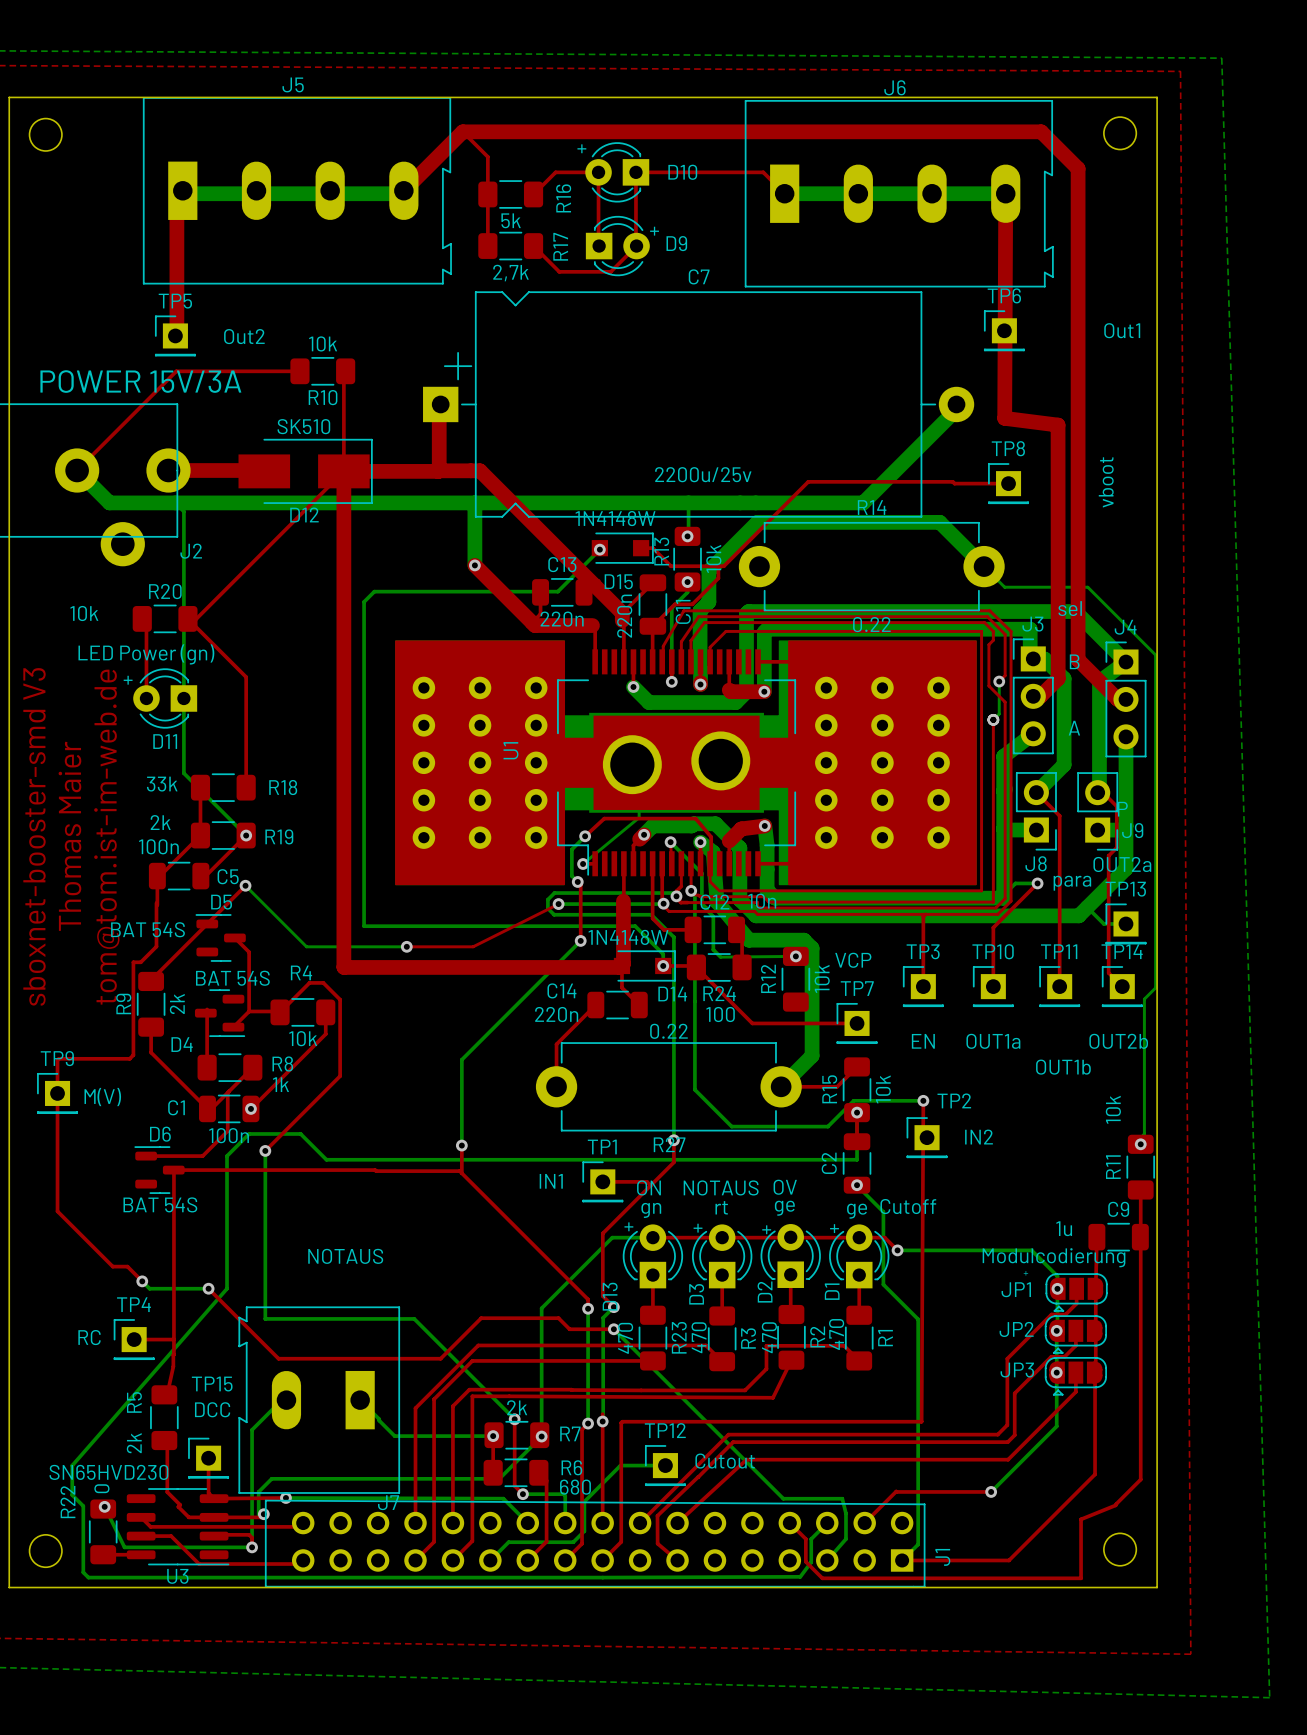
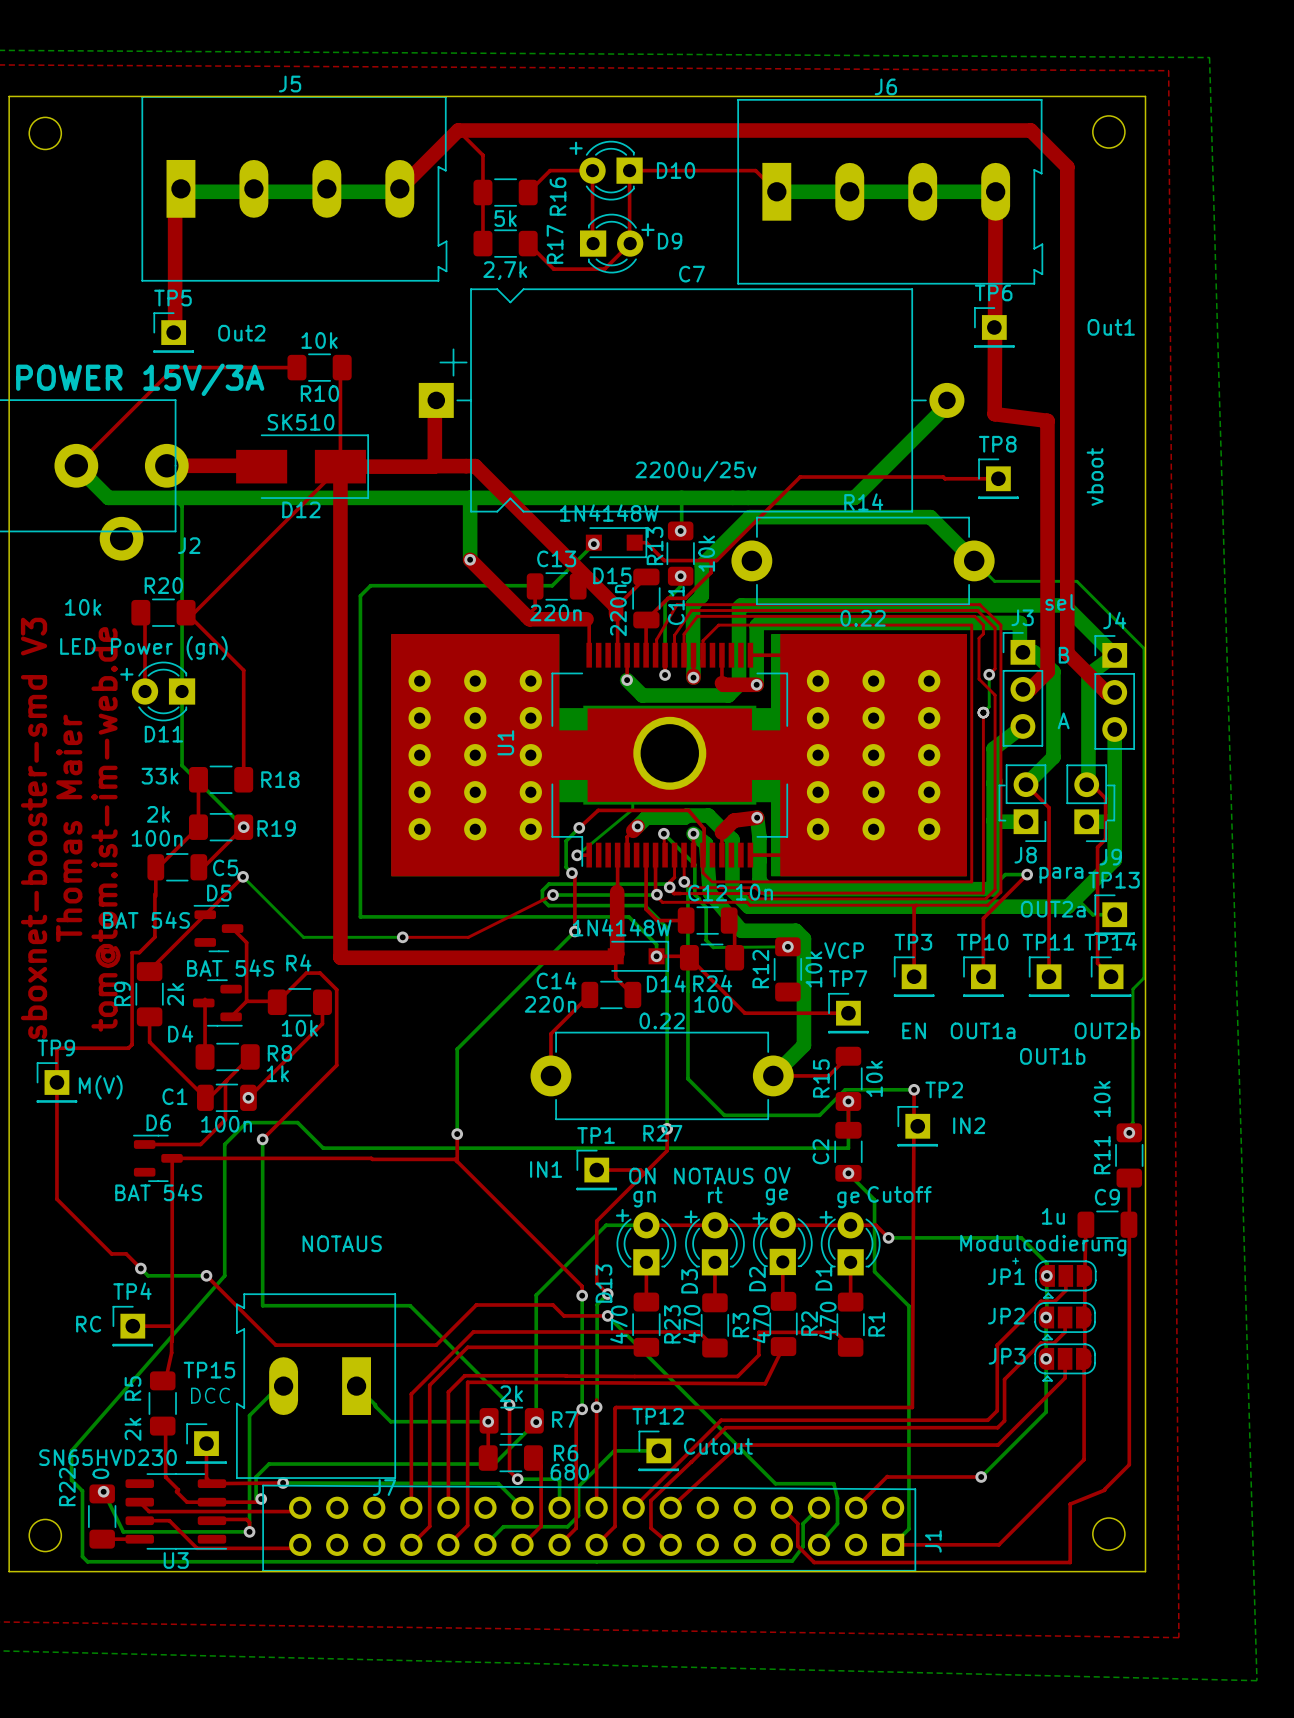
U1 footprint: [395, 640, 977, 886] -> [391, 633, 967, 877]
line: none -> (1004, 785) (999, 785) (999, 820) (1005, 820)
line: none -> (1107, 785) (1114, 785)
line: none -> (1114, 785) (1114, 820) (1107, 820)
text: P (1122, 809) -> none
J9 name position: J9 (1132, 830) -> J9 (1110, 857)
text position: OUT2a (1122, 864) -> OUT2a (1053, 909)

